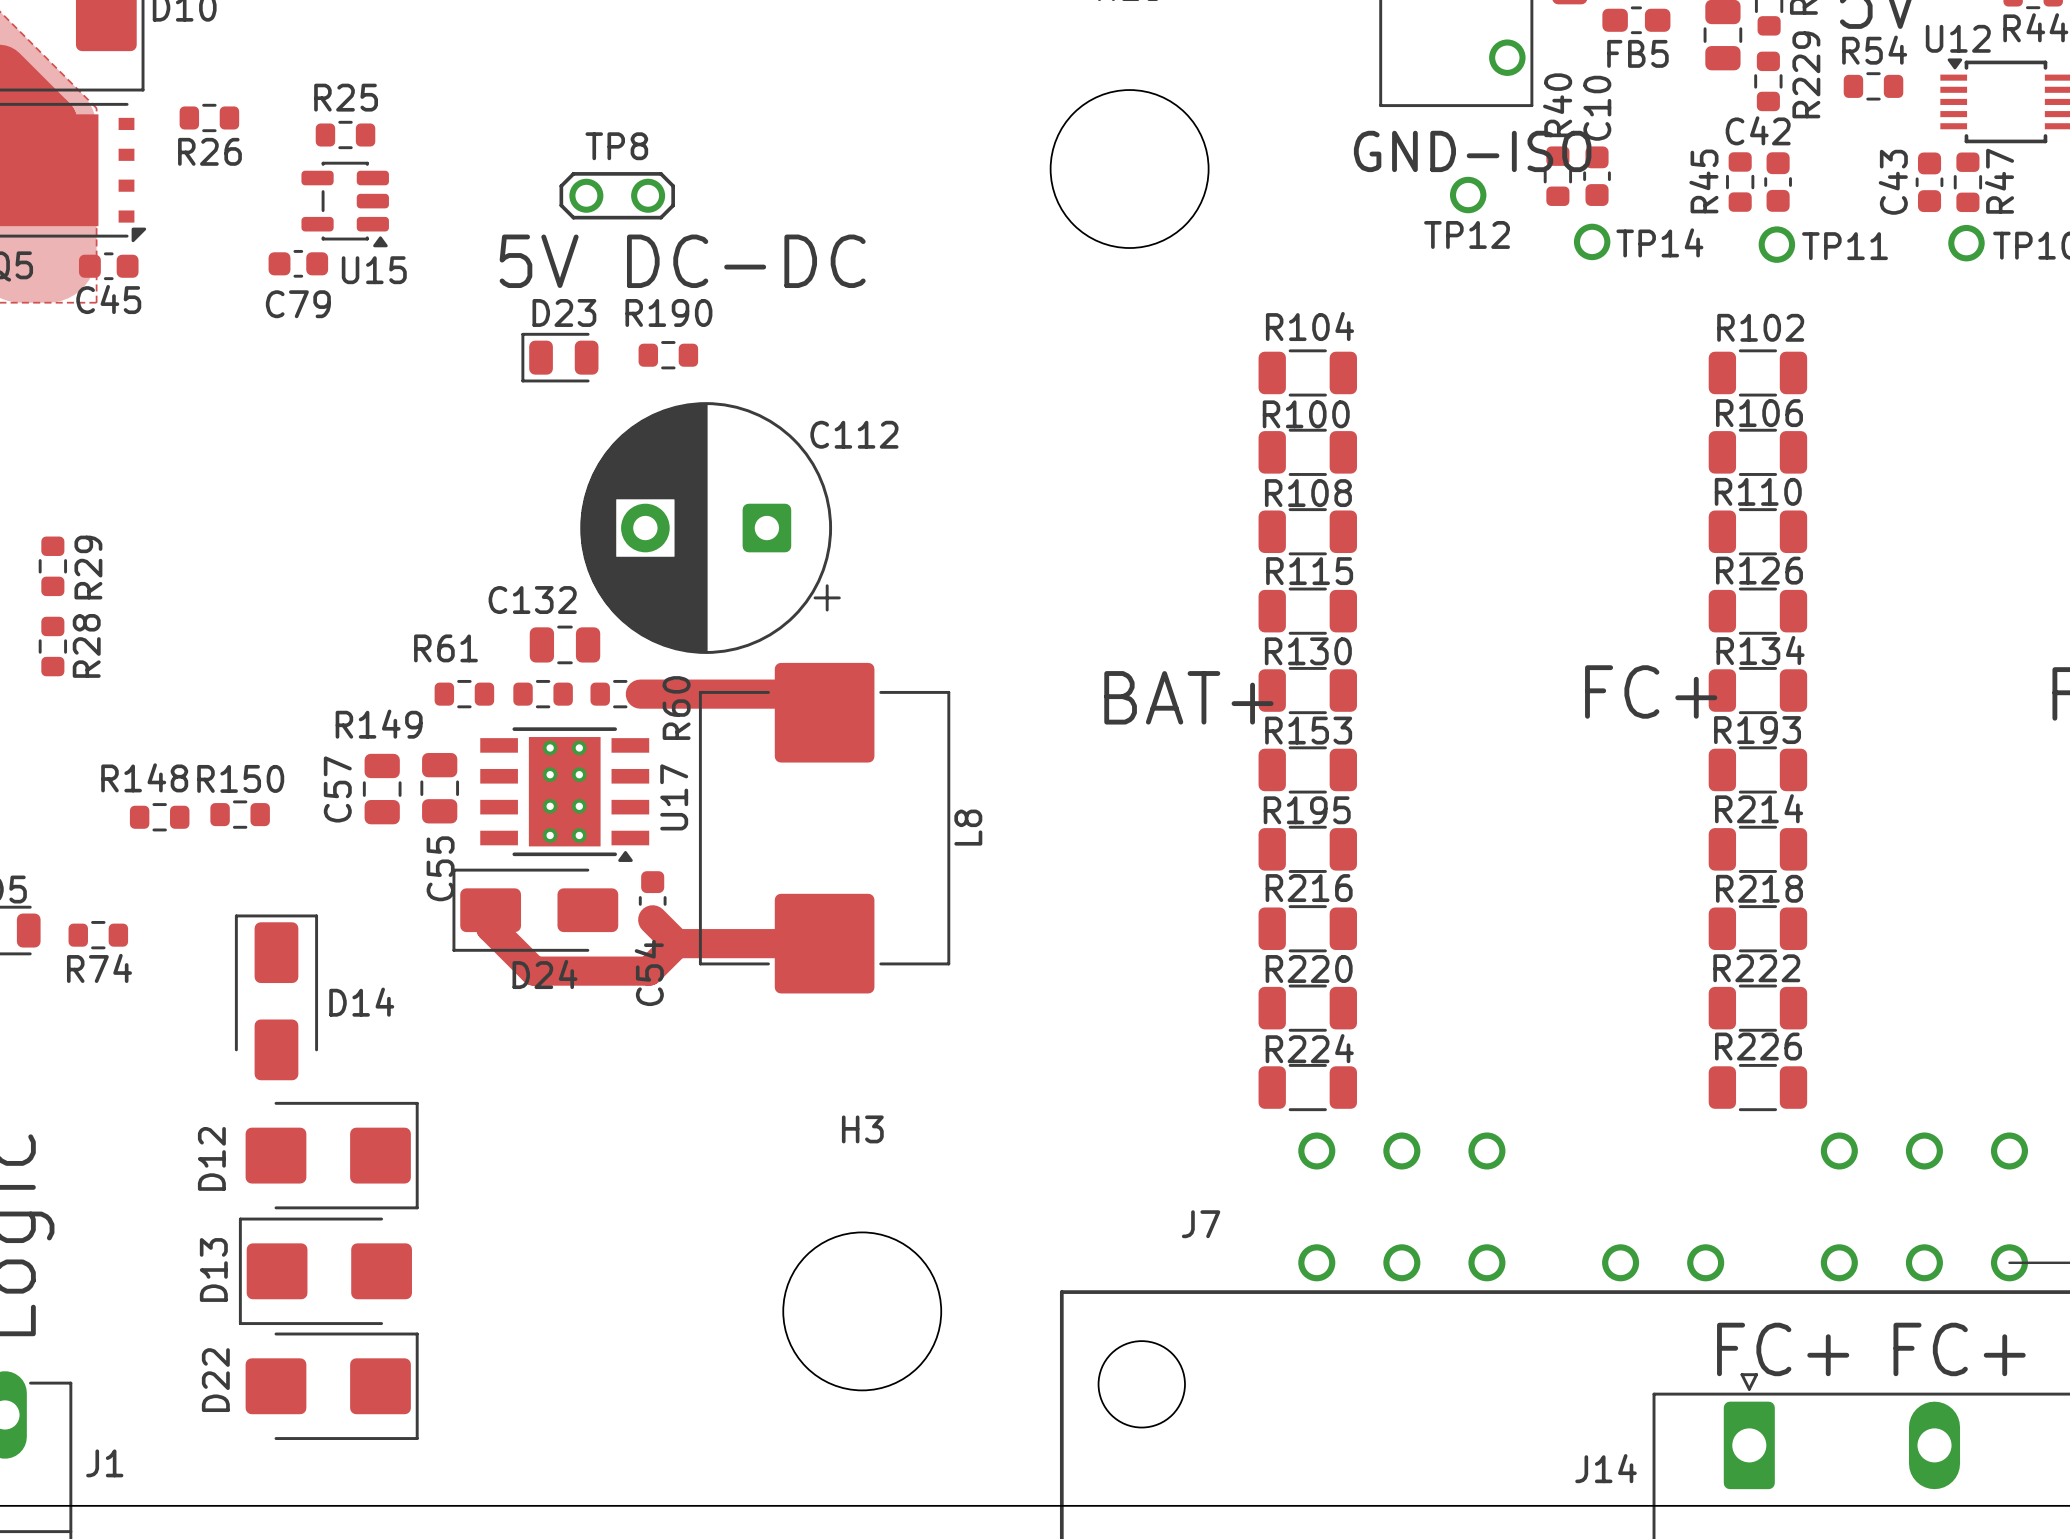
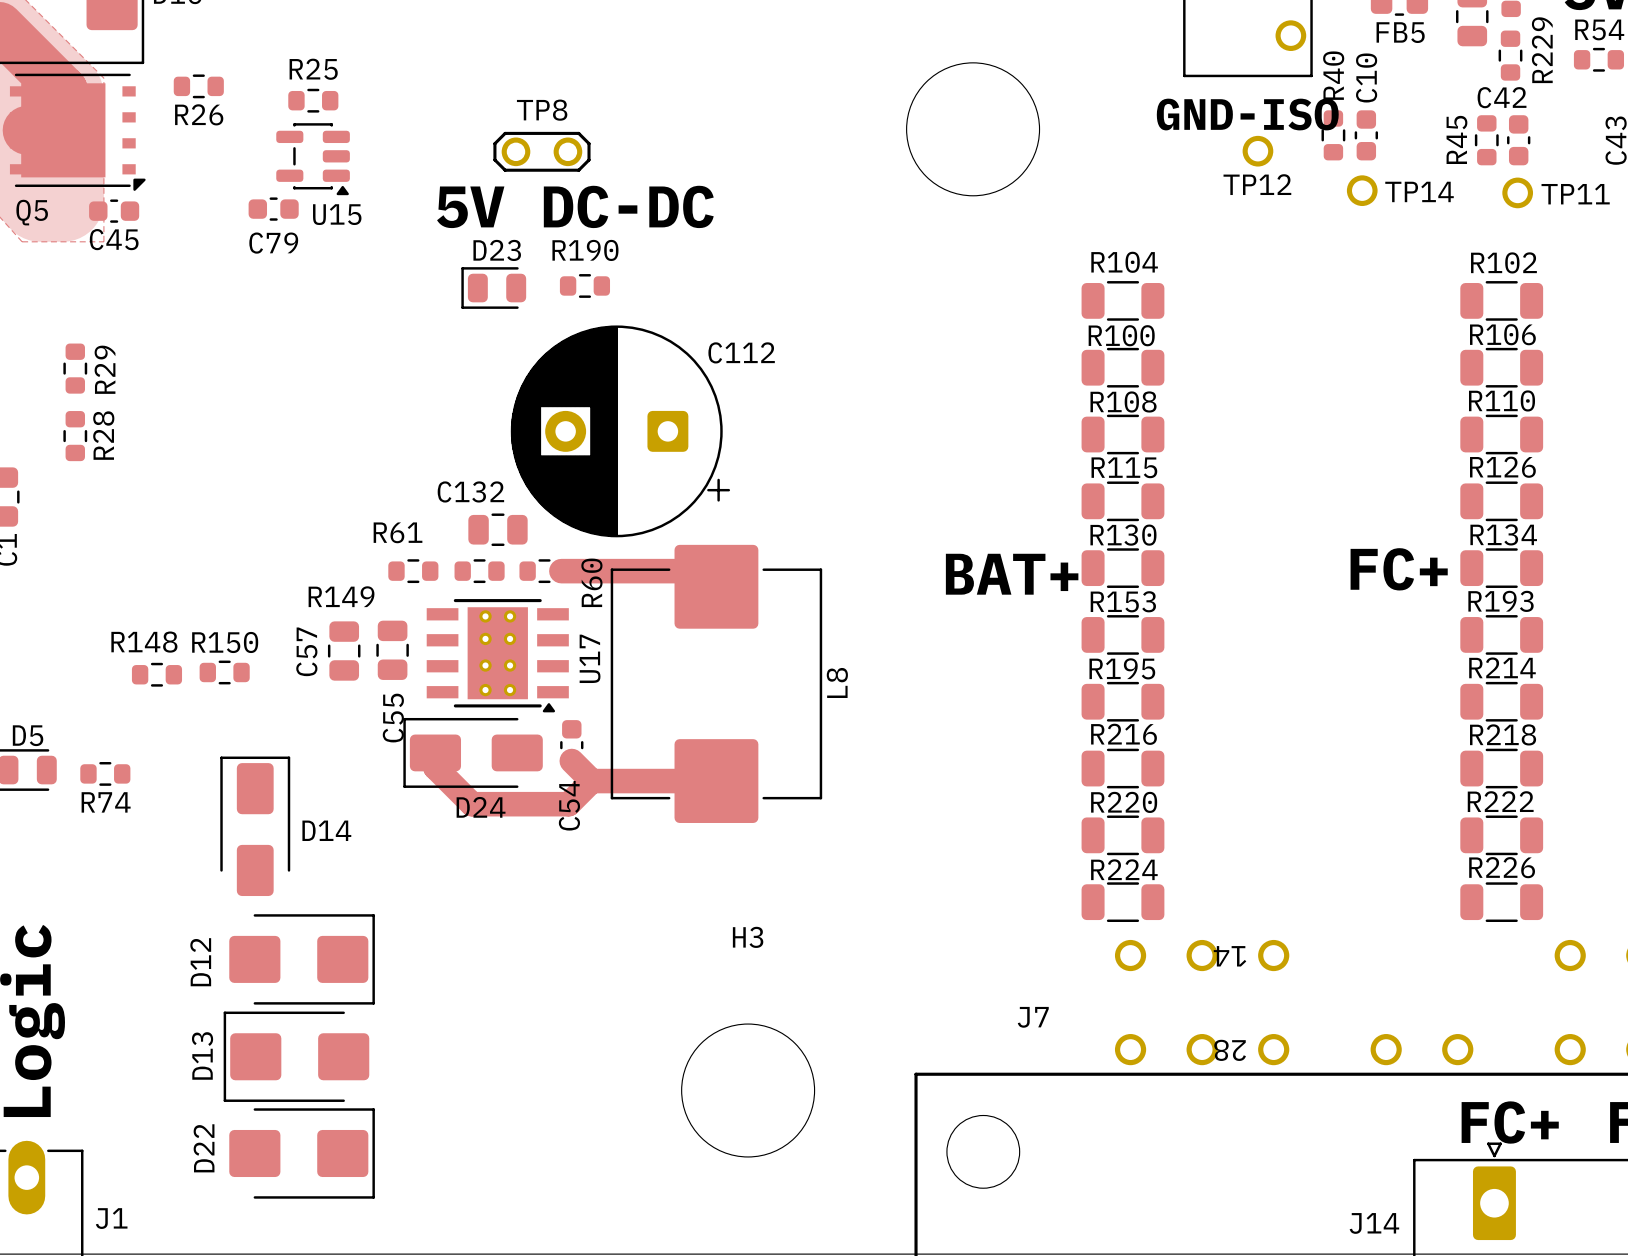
R29 position: (52, 566) -> (75, 368)
R28 position: (52, 646) -> (75, 436)
J7 text: none -> 14 (1230, 956)
J7 text: none -> 28 (1230, 1050)

